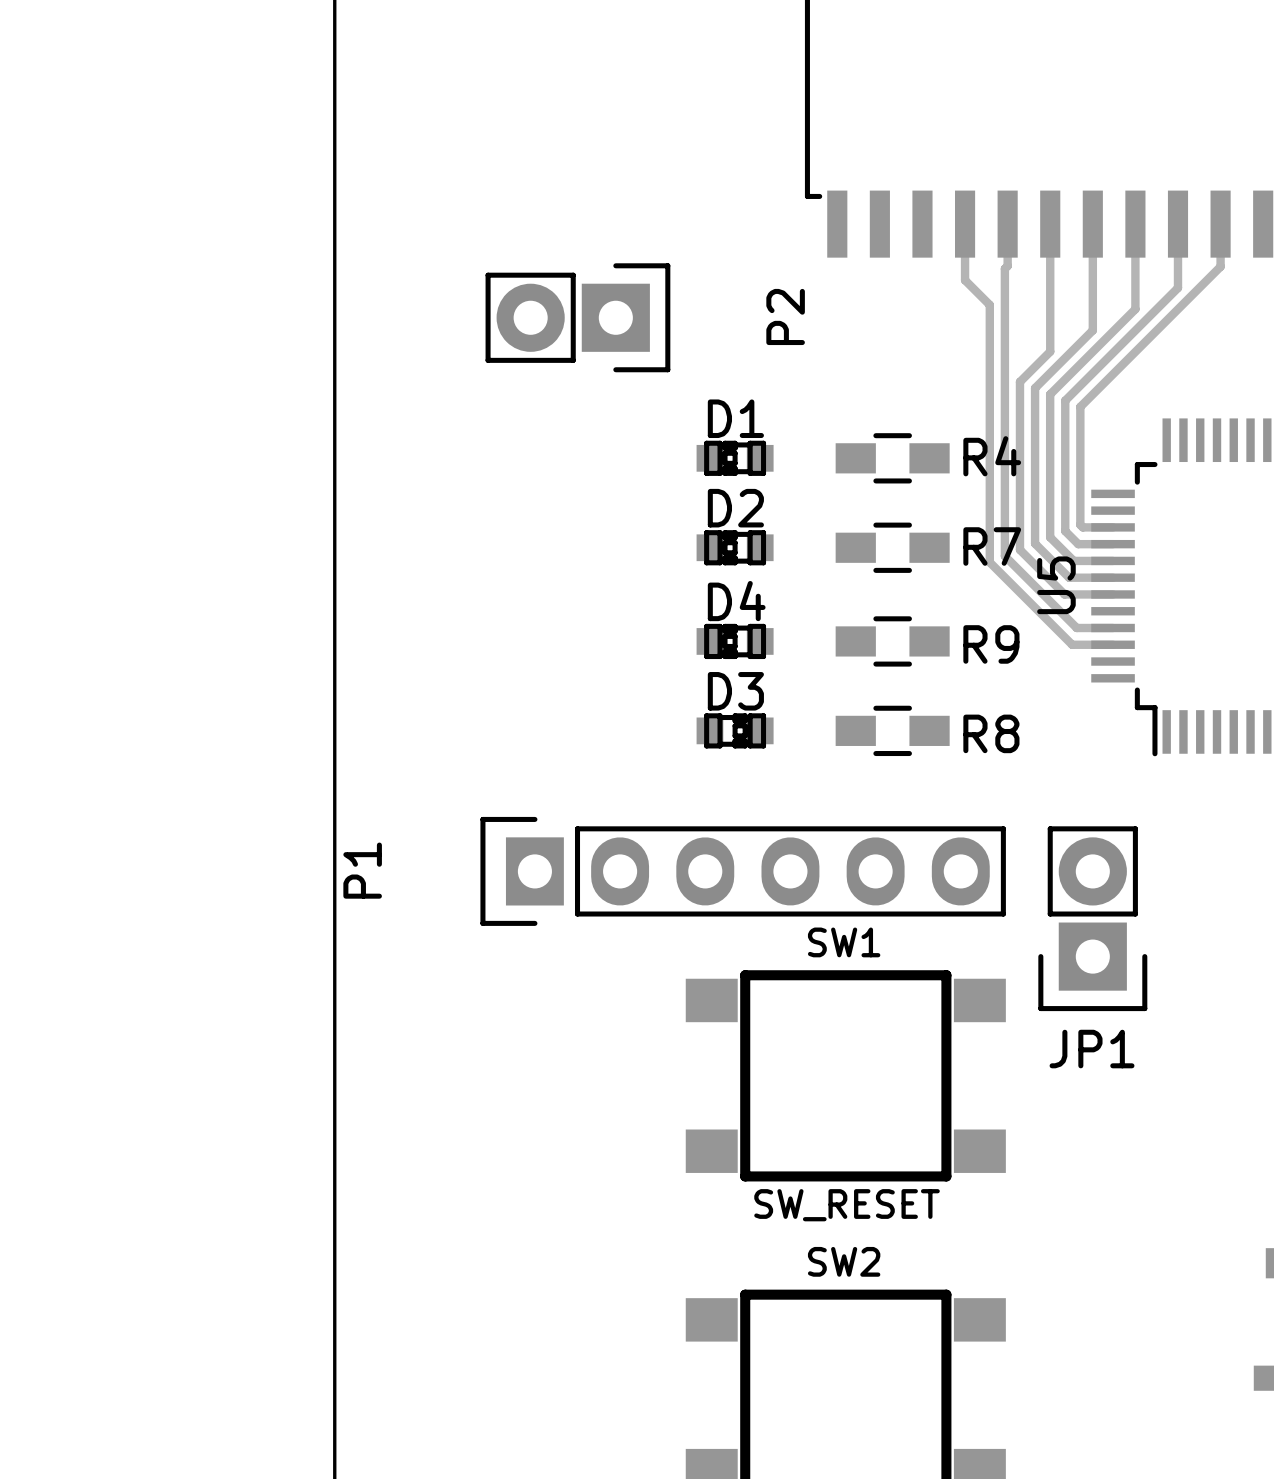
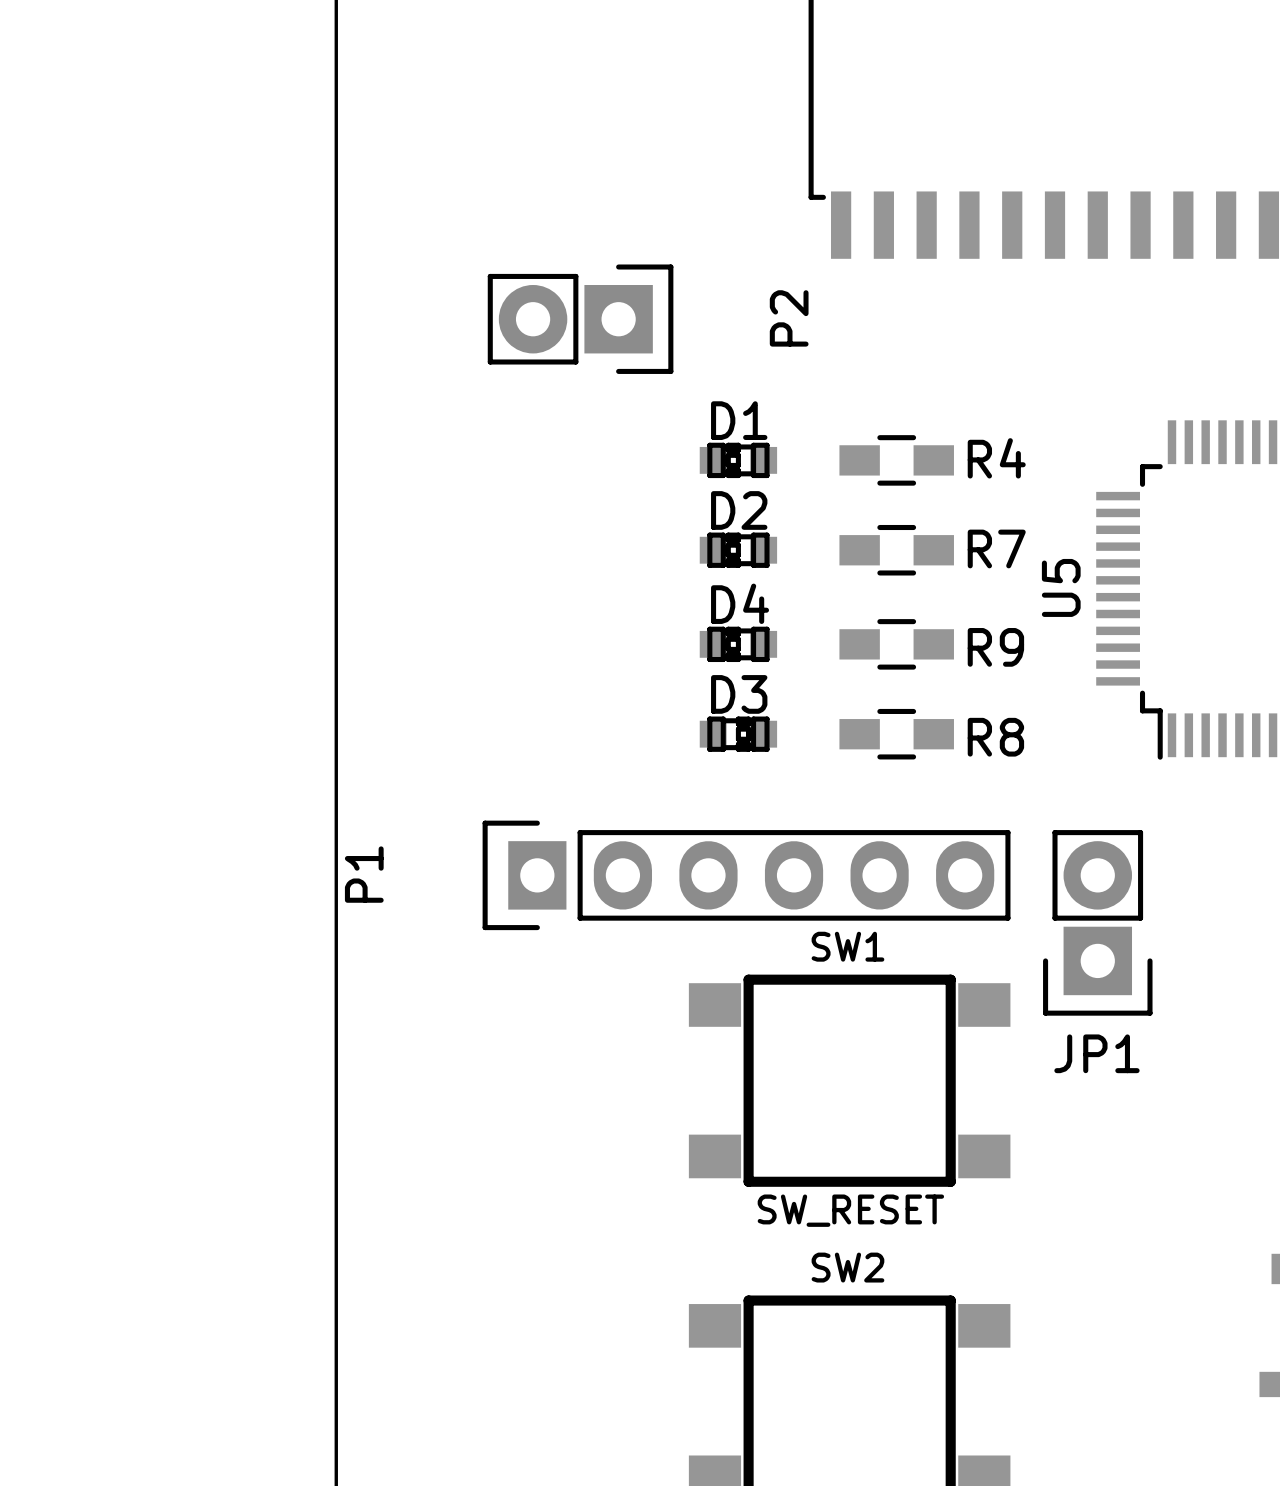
track: (965, 224) (965, 280) (989, 305) (989, 562) (1072, 644) (1113, 644) -> none
track: (1007, 224) (1007, 266) (1004, 268) (1004, 556) (1076, 628) (1113, 628) -> none
track: (1050, 224) (1050, 351) (1019, 381) (1019, 549) (1064, 594) (1113, 594) -> none
track: (1092, 224) (1092, 330) (1035, 388) (1035, 543) (1069, 577) (1113, 577) -> none
track: (1135, 224) (1135, 309) (1050, 394) (1050, 537) (1073, 560) (1113, 560) -> none
track: (1178, 224) (1178, 287) (1065, 400) (1065, 531) (1078, 544) (1113, 544) -> none
track: (1220, 224) (1220, 266) (1080, 406) (1080, 524) (1082, 527) (1113, 527) -> none

